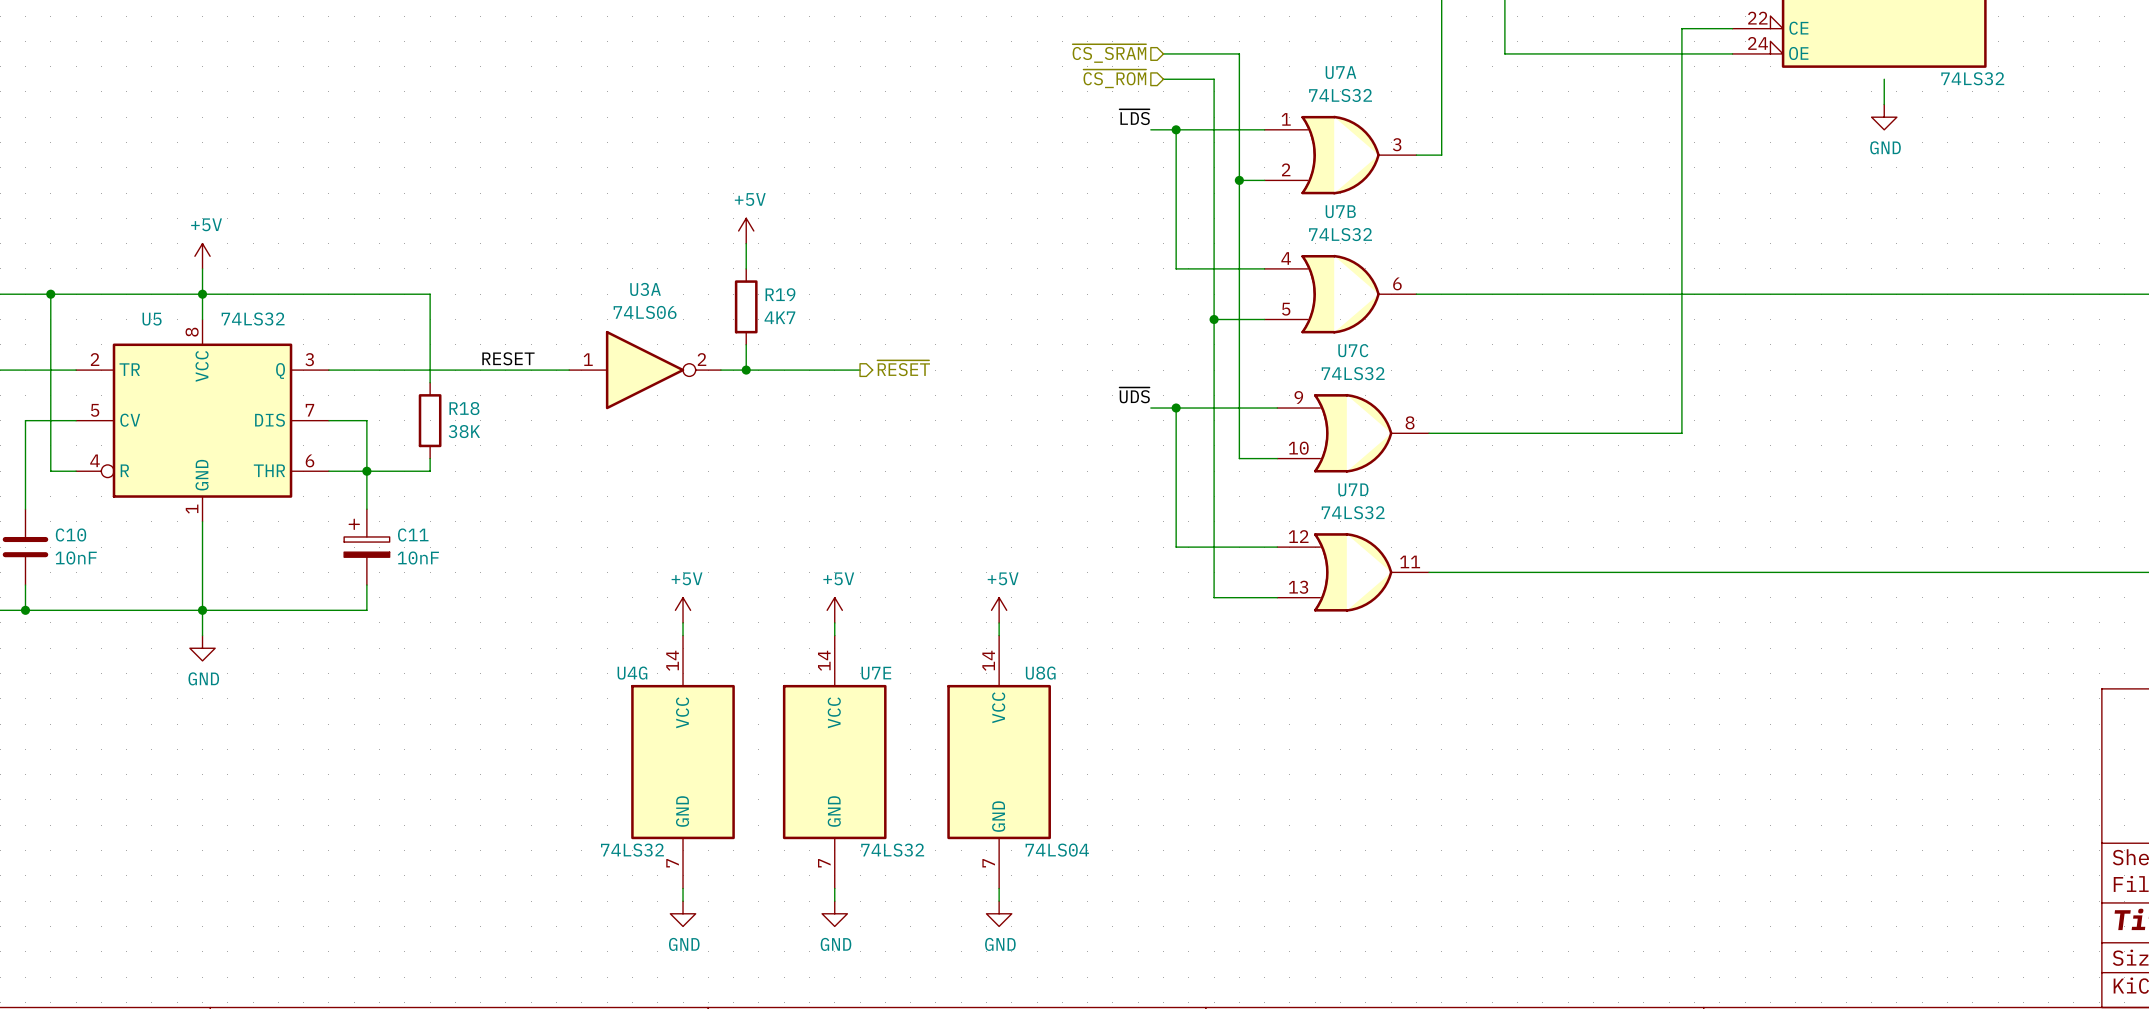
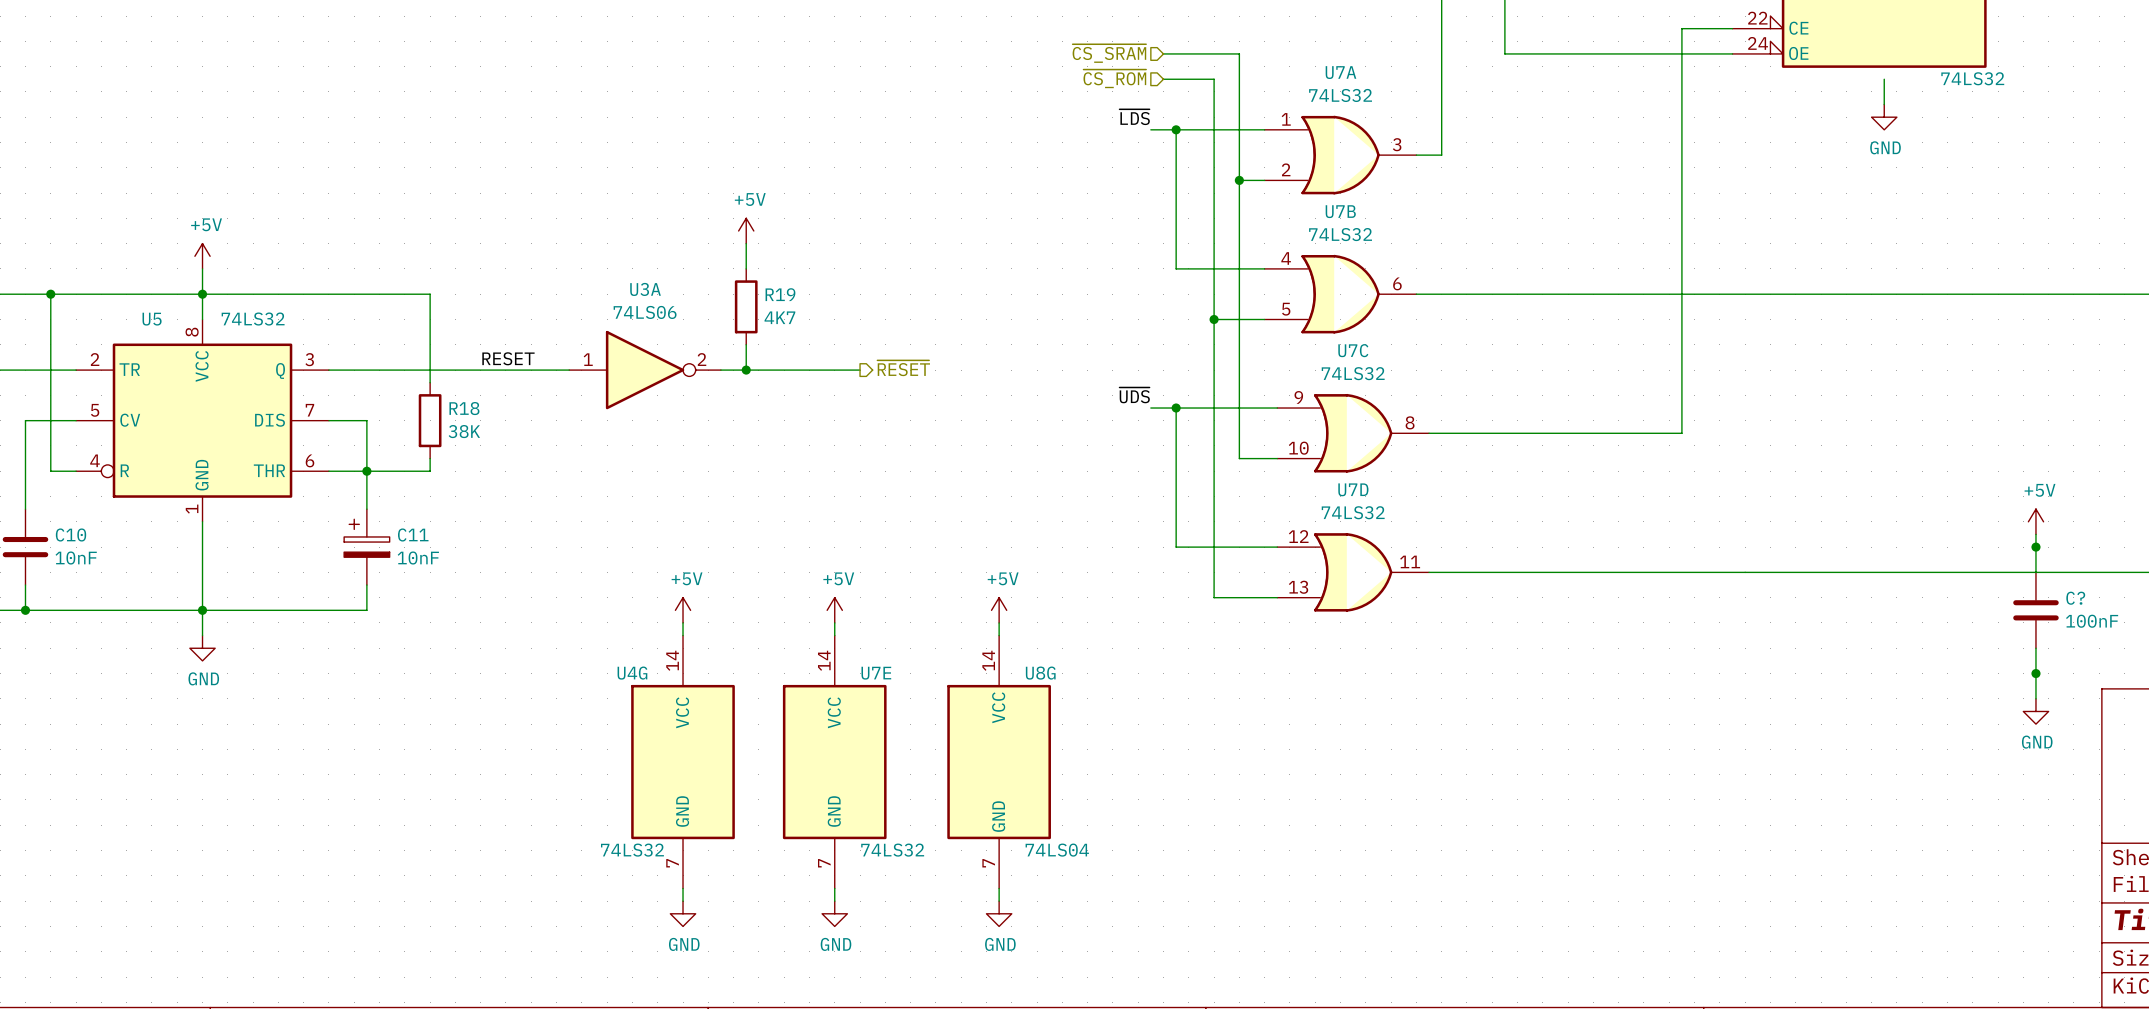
power symbol: none -> +5V (2035, 521)
wire: none -> (2035, 534) (2035, 572)
junction: none -> (2035, 547)
C?: none -> 100nF (2035, 610)
wire: none -> (2035, 648) (2035, 698)
junction: none -> (2035, 673)
power symbol: none -> GND (2035, 711)

